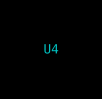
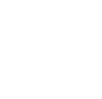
U4: (51, 48) -> none

